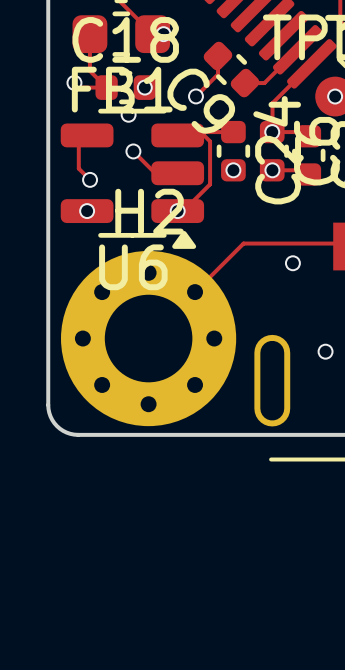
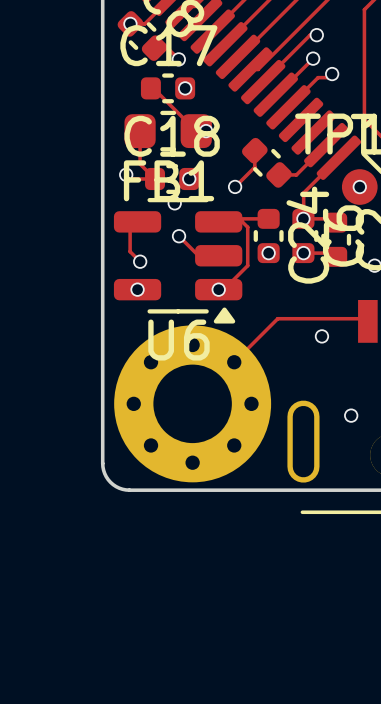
C9 name: C9 (201, 101) -> none
H2 name: H2 (149, 211) -> none

